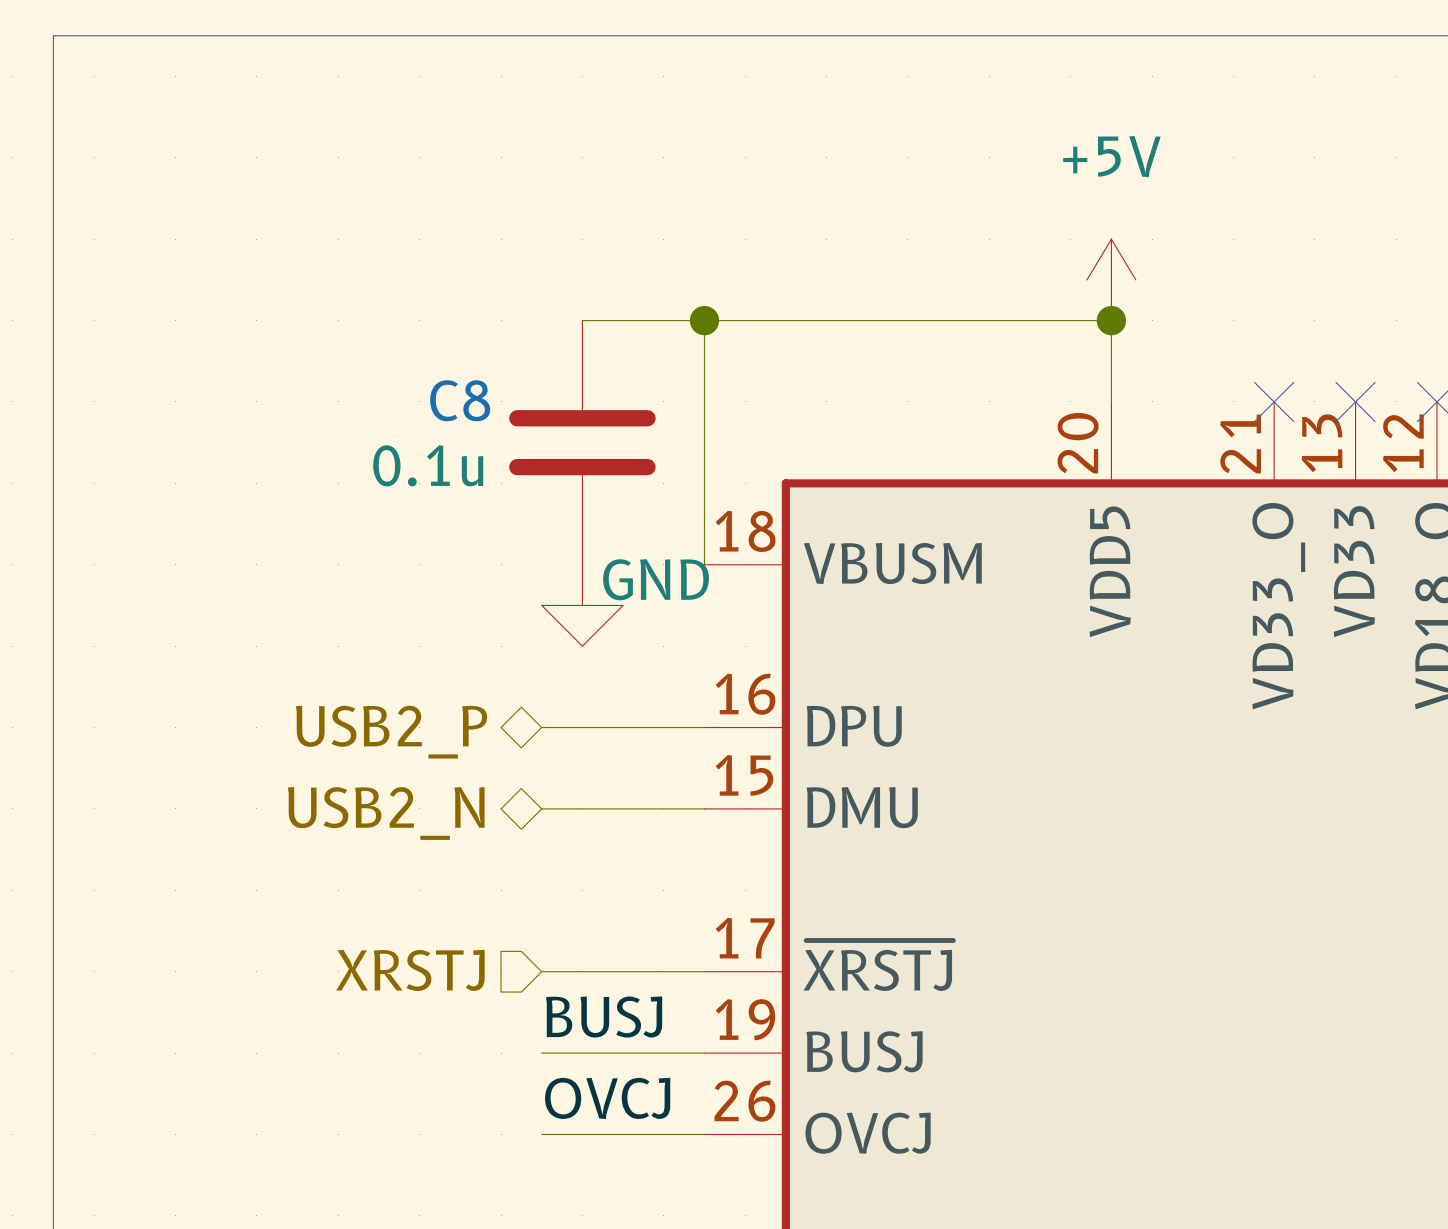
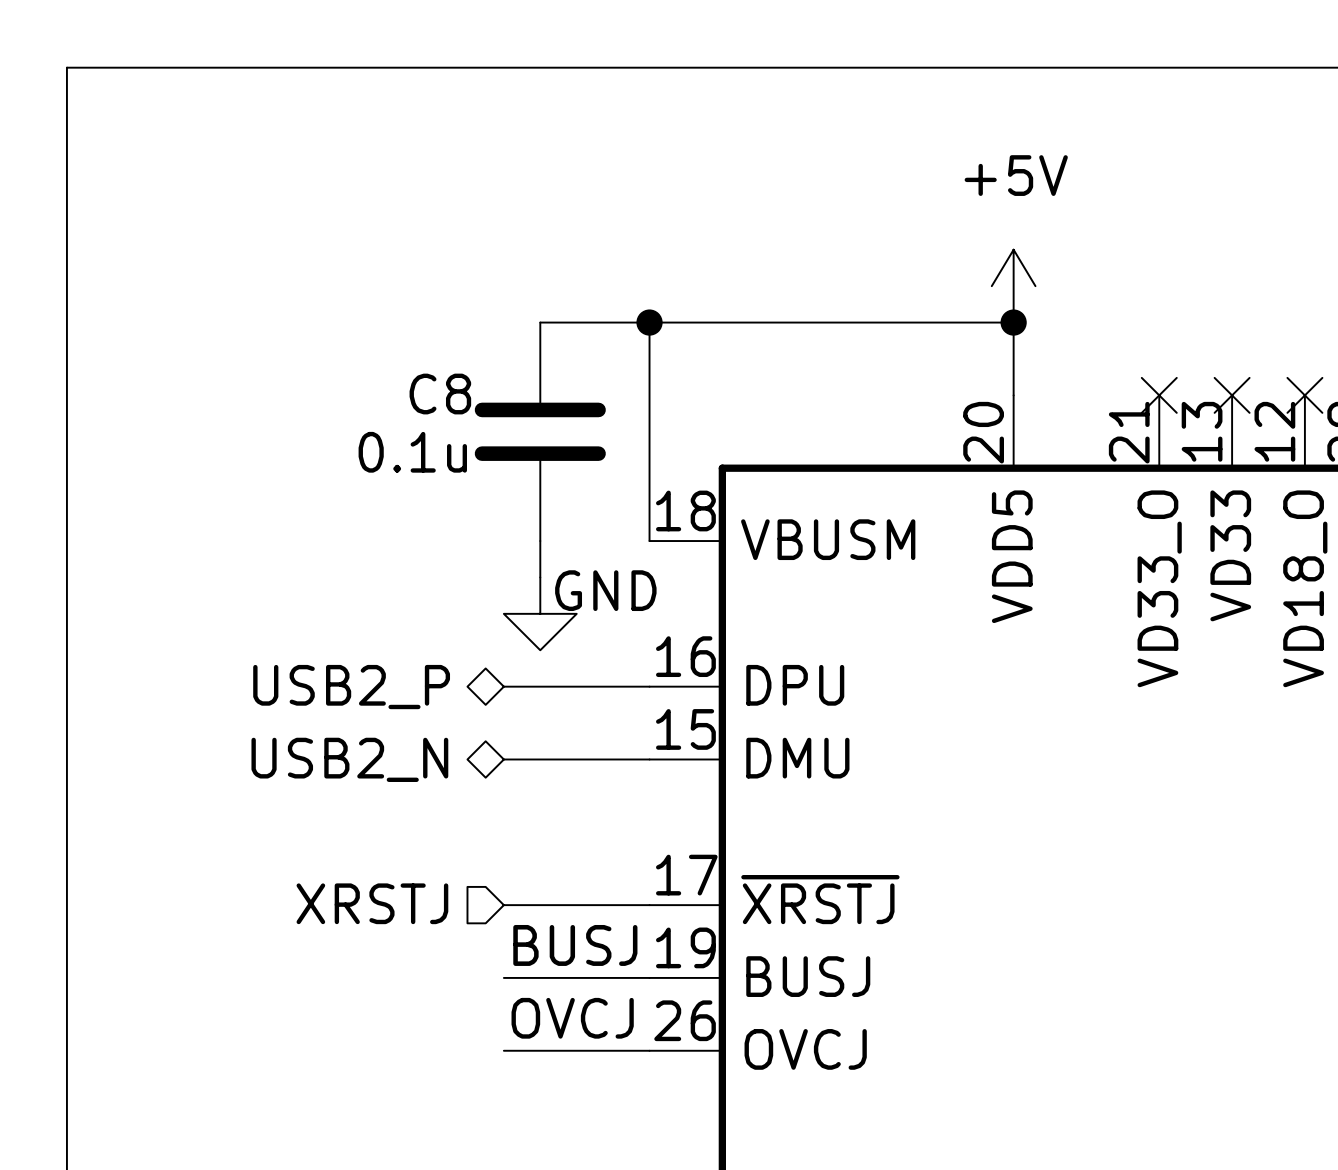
power symbol position: GND (582, 605) -> GND (540, 613)

